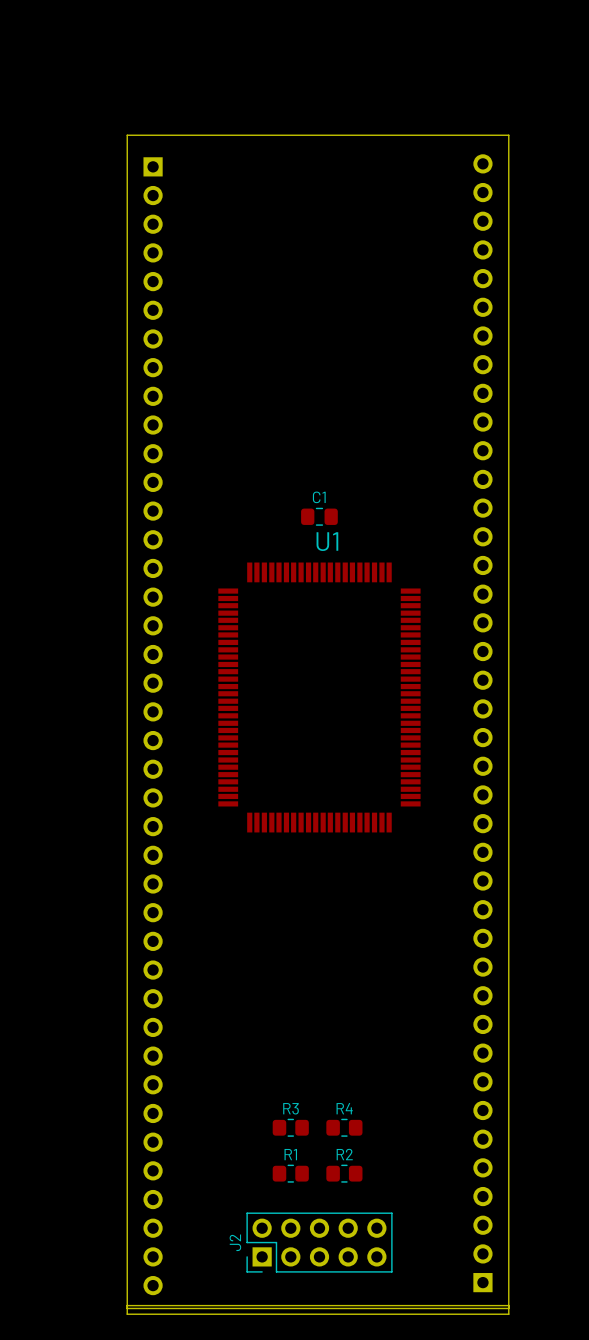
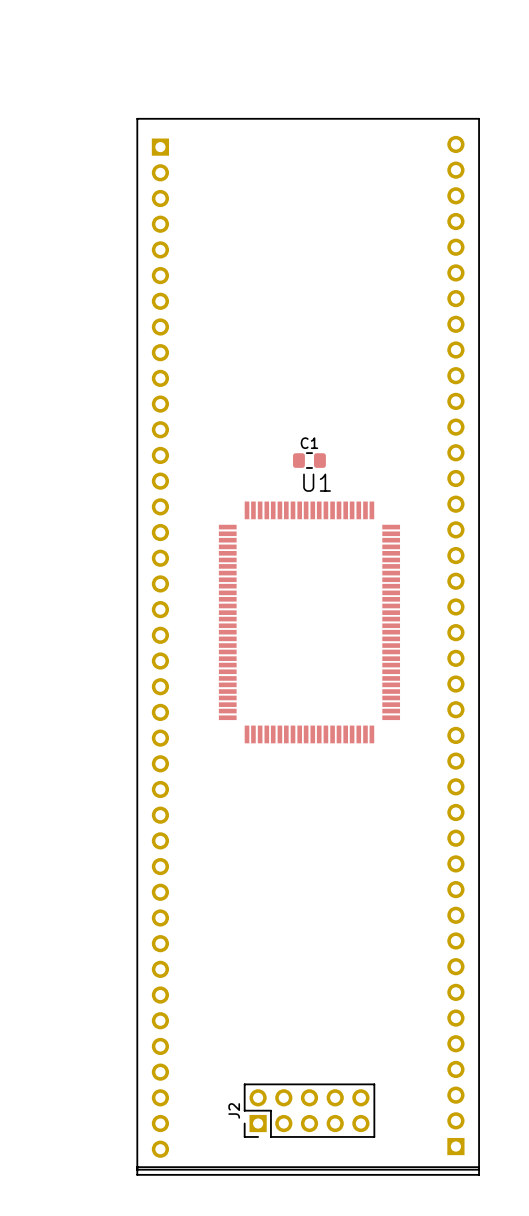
R3: (290, 1127) -> none
R4: (344, 1127) -> none
R1: (290, 1173) -> none
R2: (344, 1173) -> none

